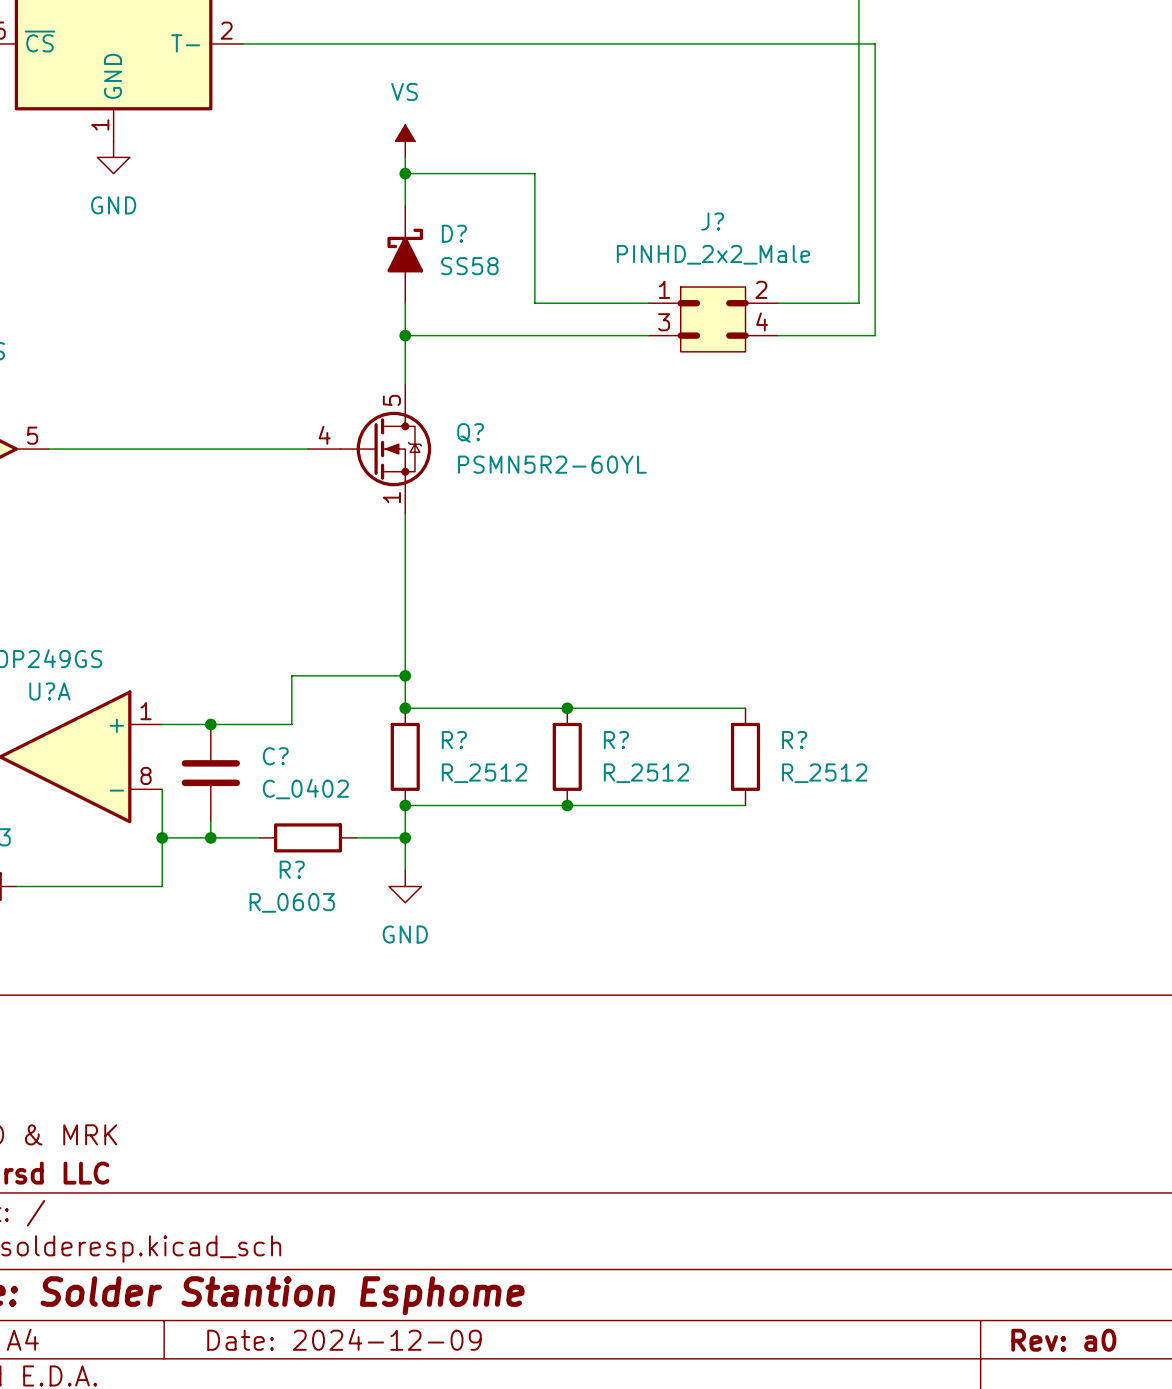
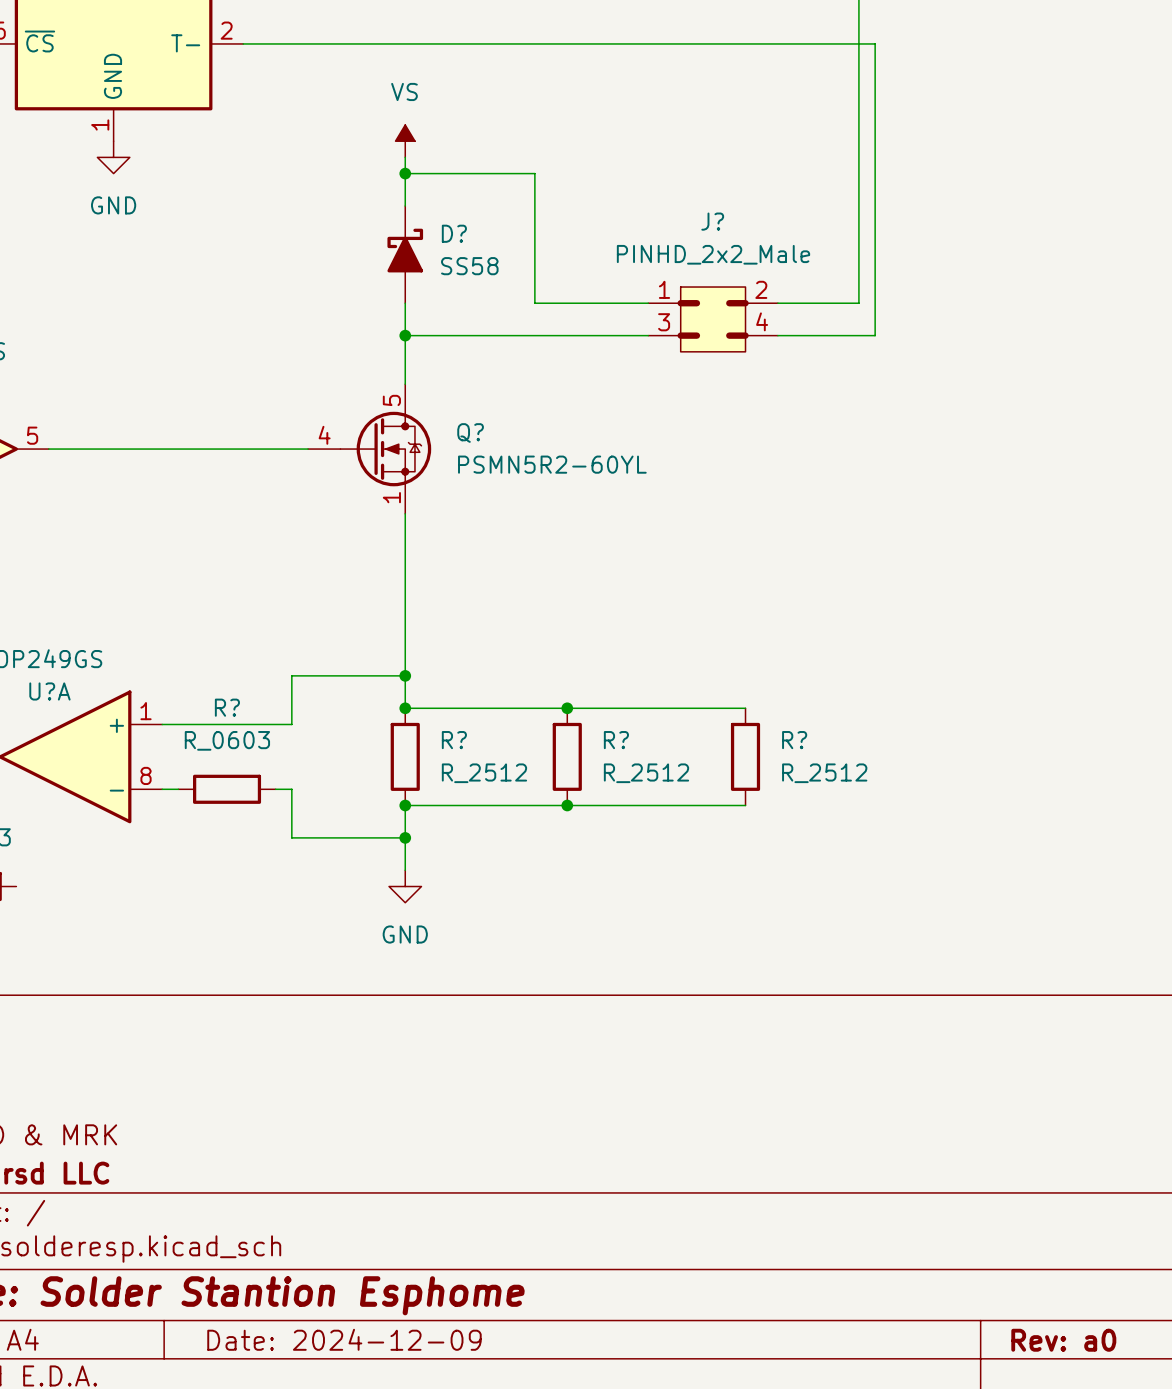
junction: (210, 724) -> none
C?: C_0402 (210, 773) -> none
wire: (162, 789) (162, 886) (16, 886) -> (162, 789) (178, 789)
wire: none -> (275, 789) (291, 789) (291, 837) (356, 837)
wire: (210, 821) (210, 837) -> none
wire: (162, 837) (259, 837) -> none
junction: (162, 837) -> none
junction: (210, 837) -> none
R? position: (308, 837) -> (227, 789)
R? name position: R? (292, 869) -> R? (227, 707)
R? value position: R_0603 (292, 902) -> R_0603 (227, 740)

